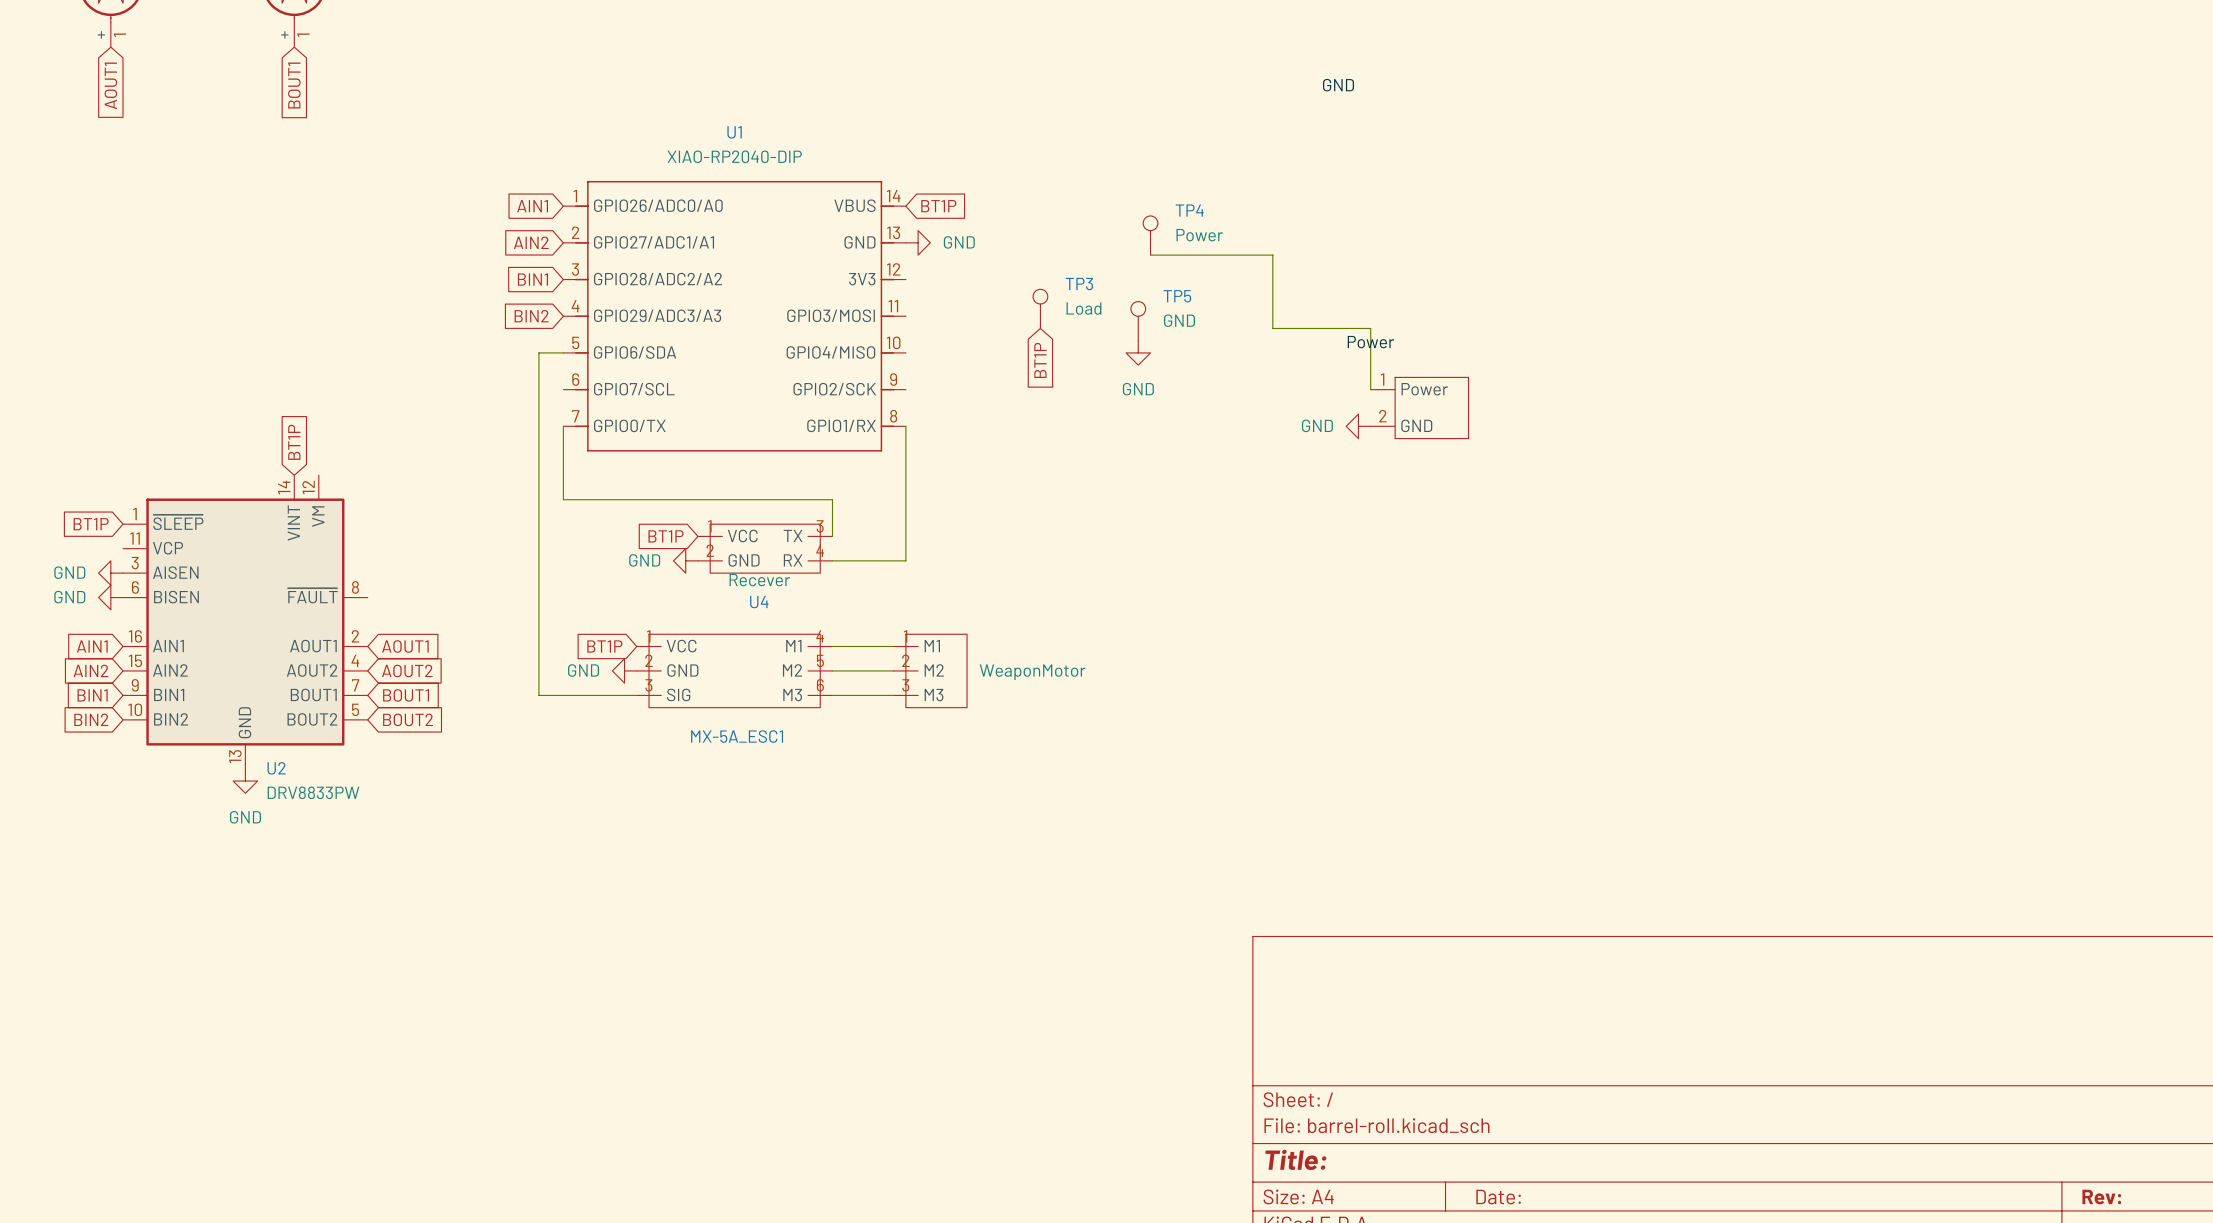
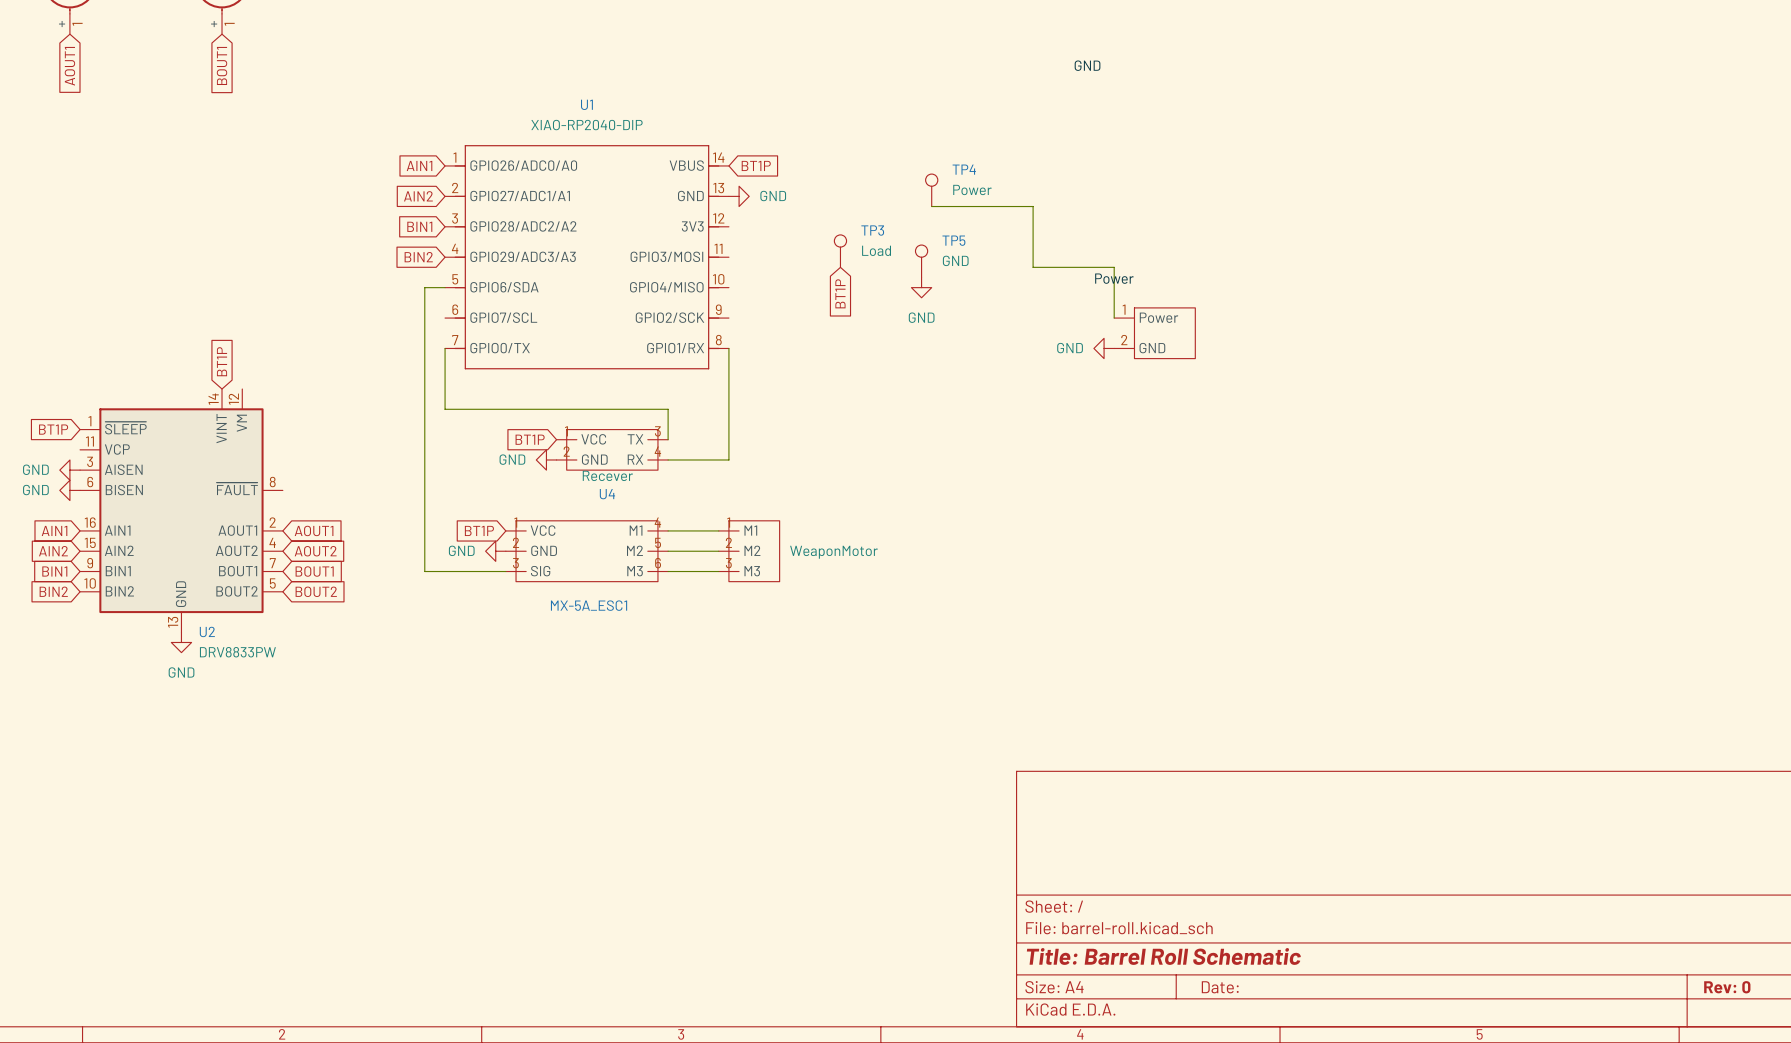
title block: Title: (1295, 1159) -> Title: Barrel Roll Schematic (1163, 956)
title block: Rev: (2101, 1197) -> Rev: 0 (1727, 987)

